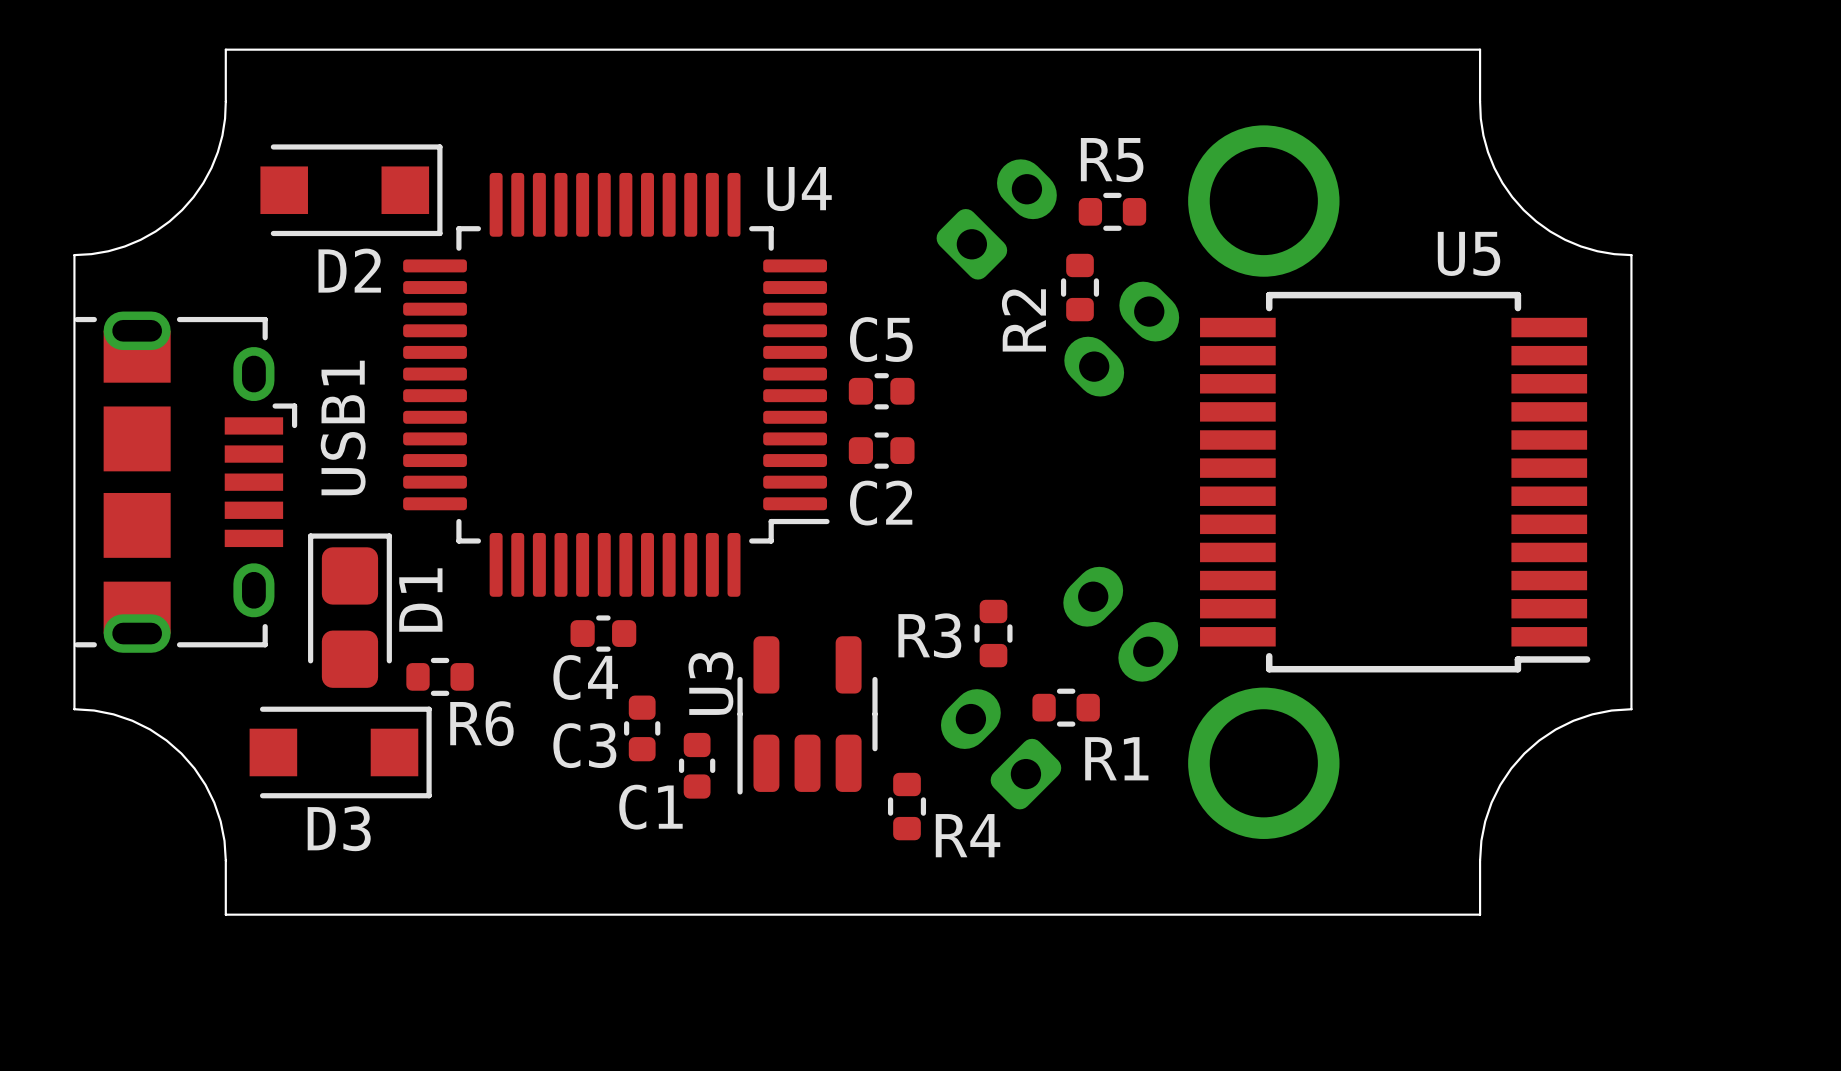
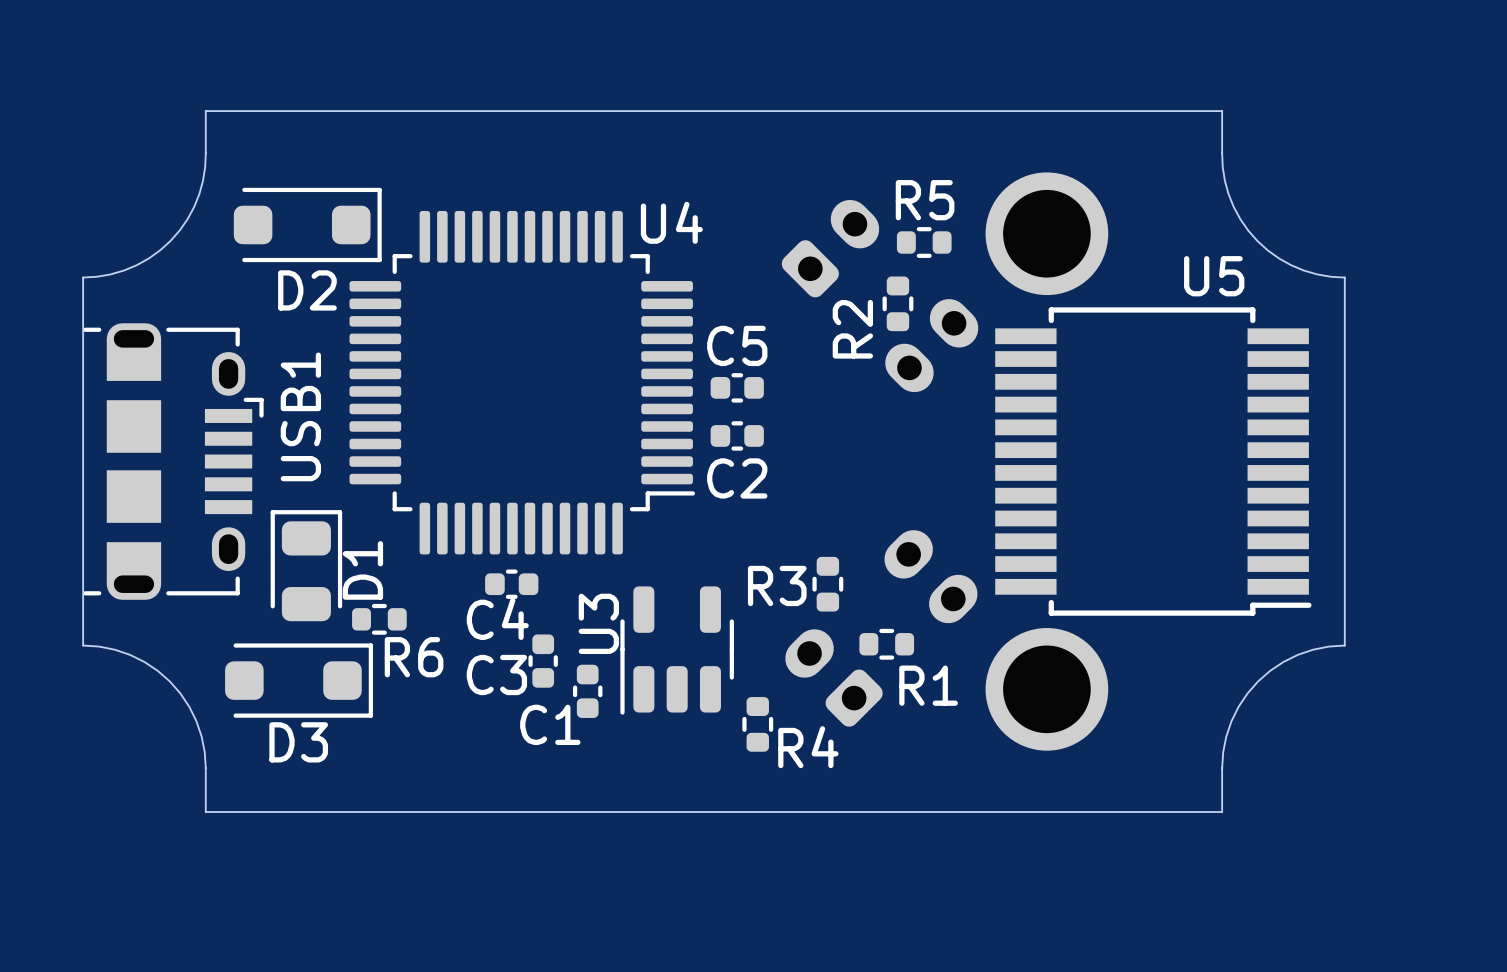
D2 footprint: [260, 144, 443, 237] -> [233, 187, 382, 263]
D1 footprint: [308, 533, 392, 688] -> [270, 510, 343, 622]
D1 name position: D1 (420, 600) -> D1 (362, 570)
D3 footprint: [249, 706, 432, 799] -> [225, 643, 373, 718]

